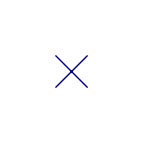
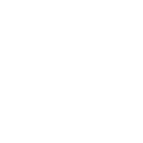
no-connect mark: (71, 71) -> none

